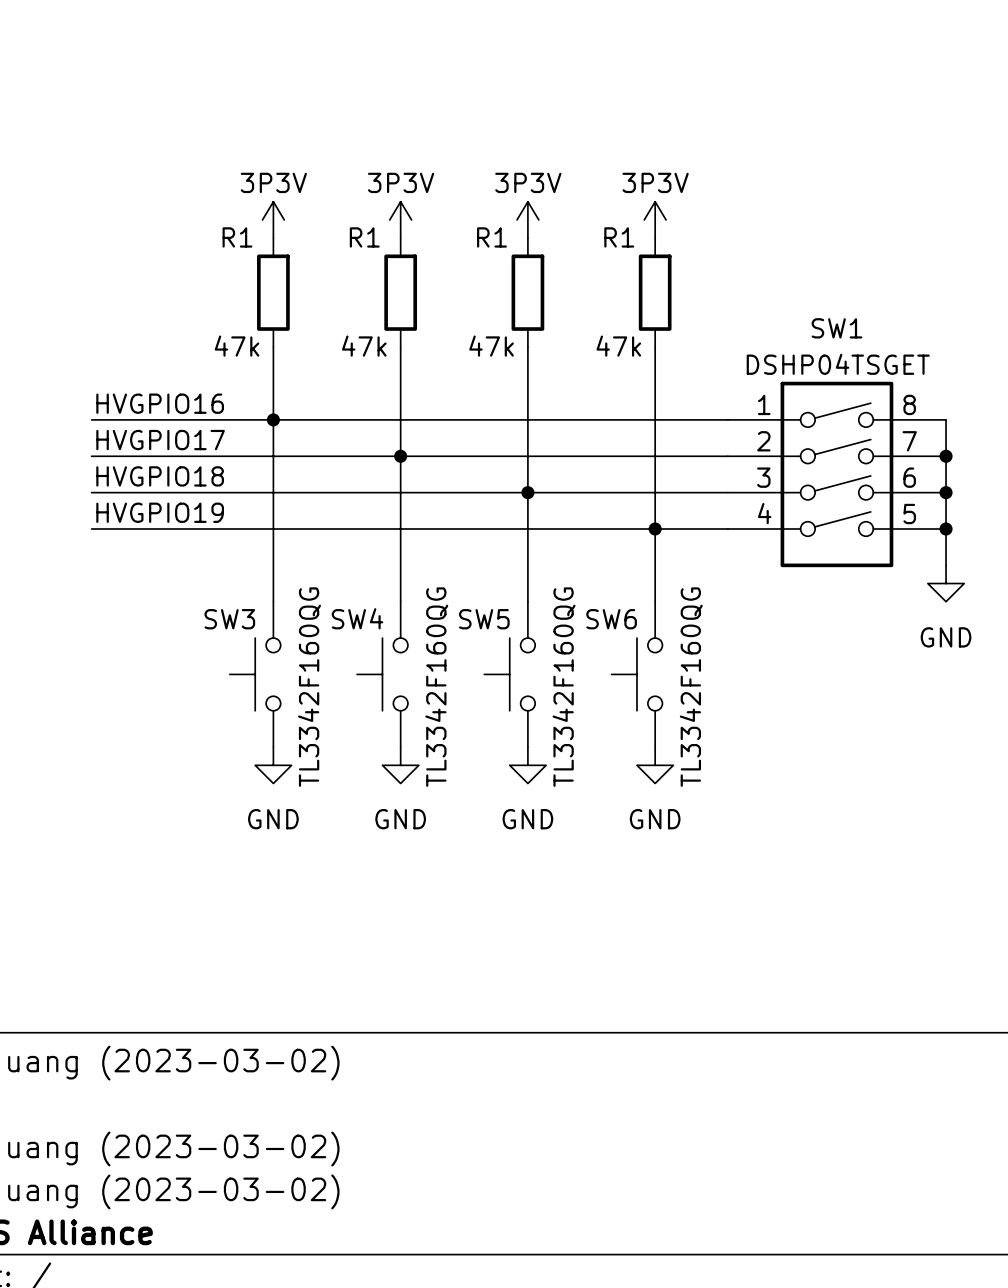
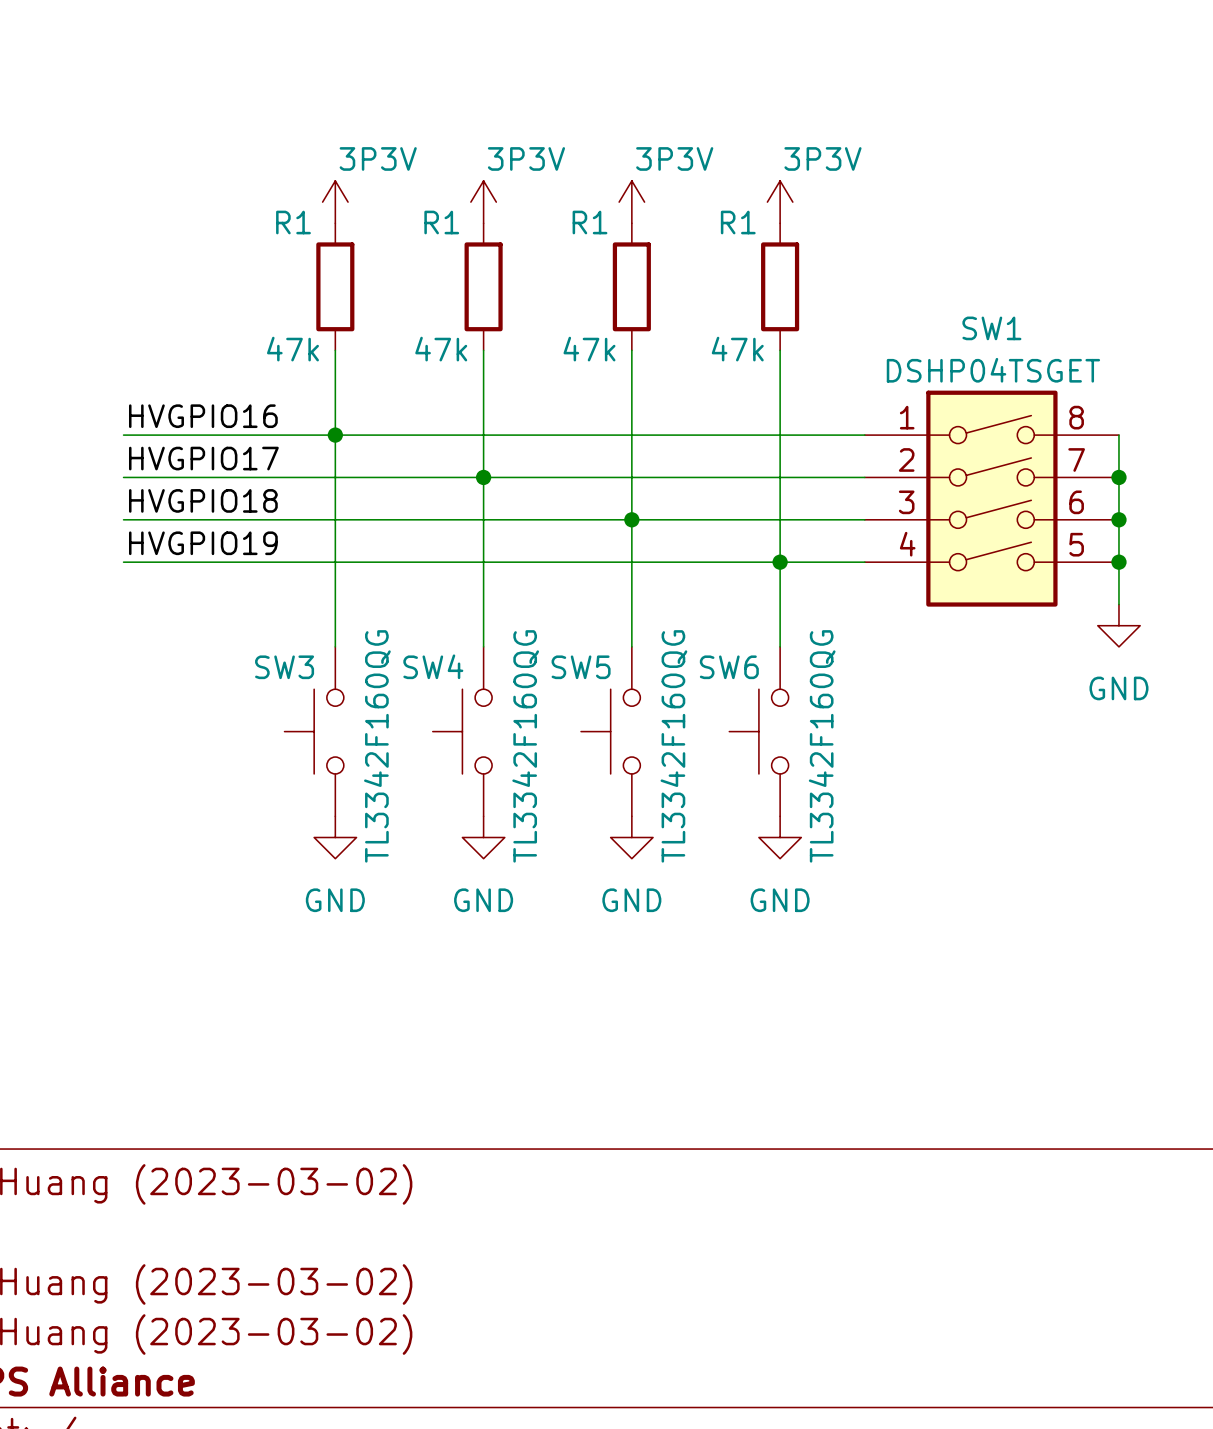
power symbol text position: 3P3V (273, 182) -> 3P3V (378, 158)
power symbol text position: 3P3V (401, 182) -> 3P3V (526, 158)
power symbol text position: 3P3V (528, 182) -> 3P3V (674, 158)
power symbol text position: 3P3V (655, 182) -> 3P3V (822, 158)

